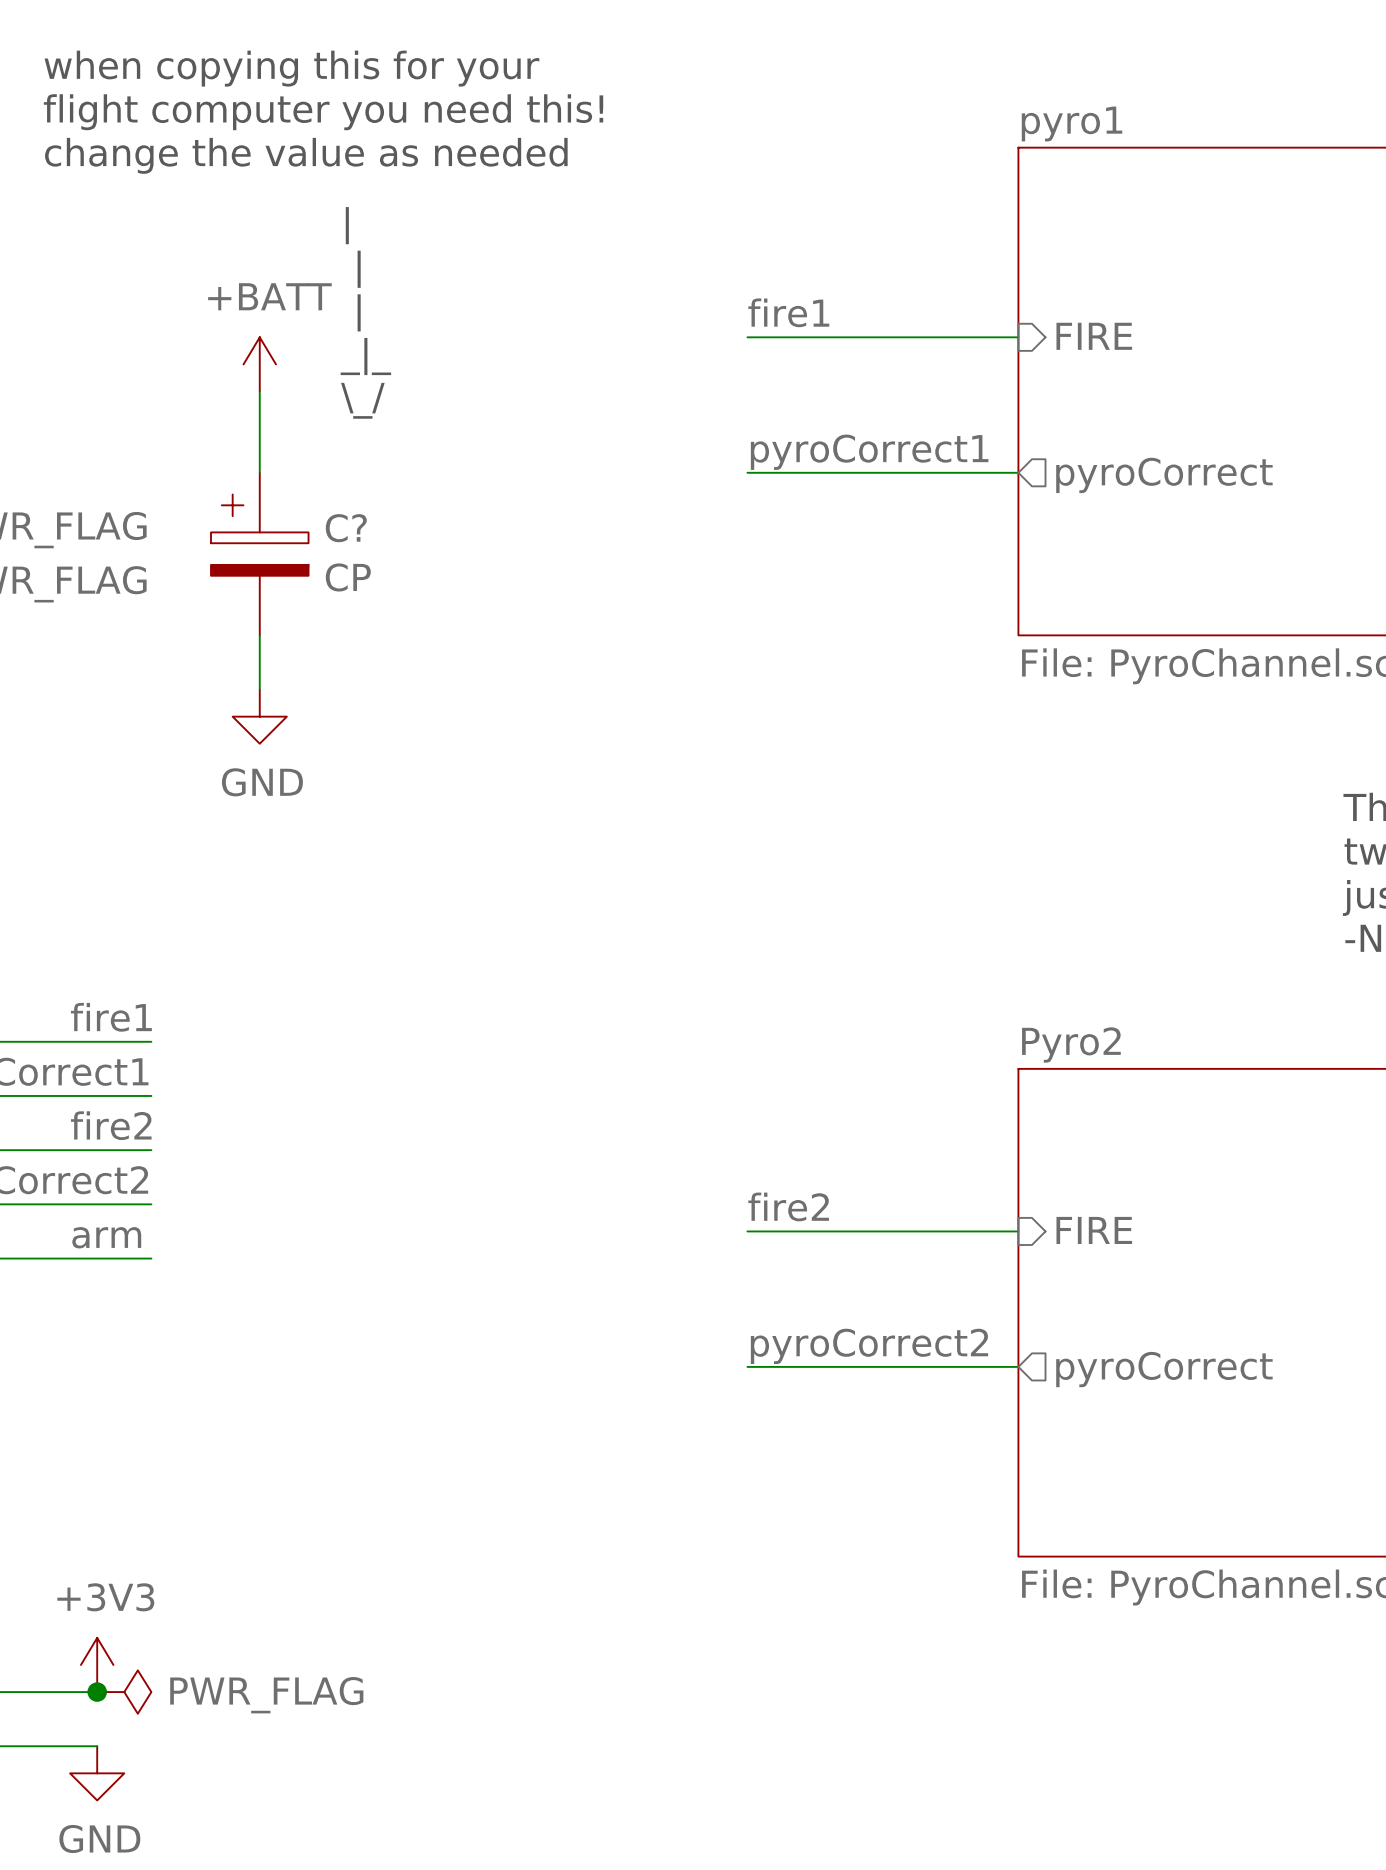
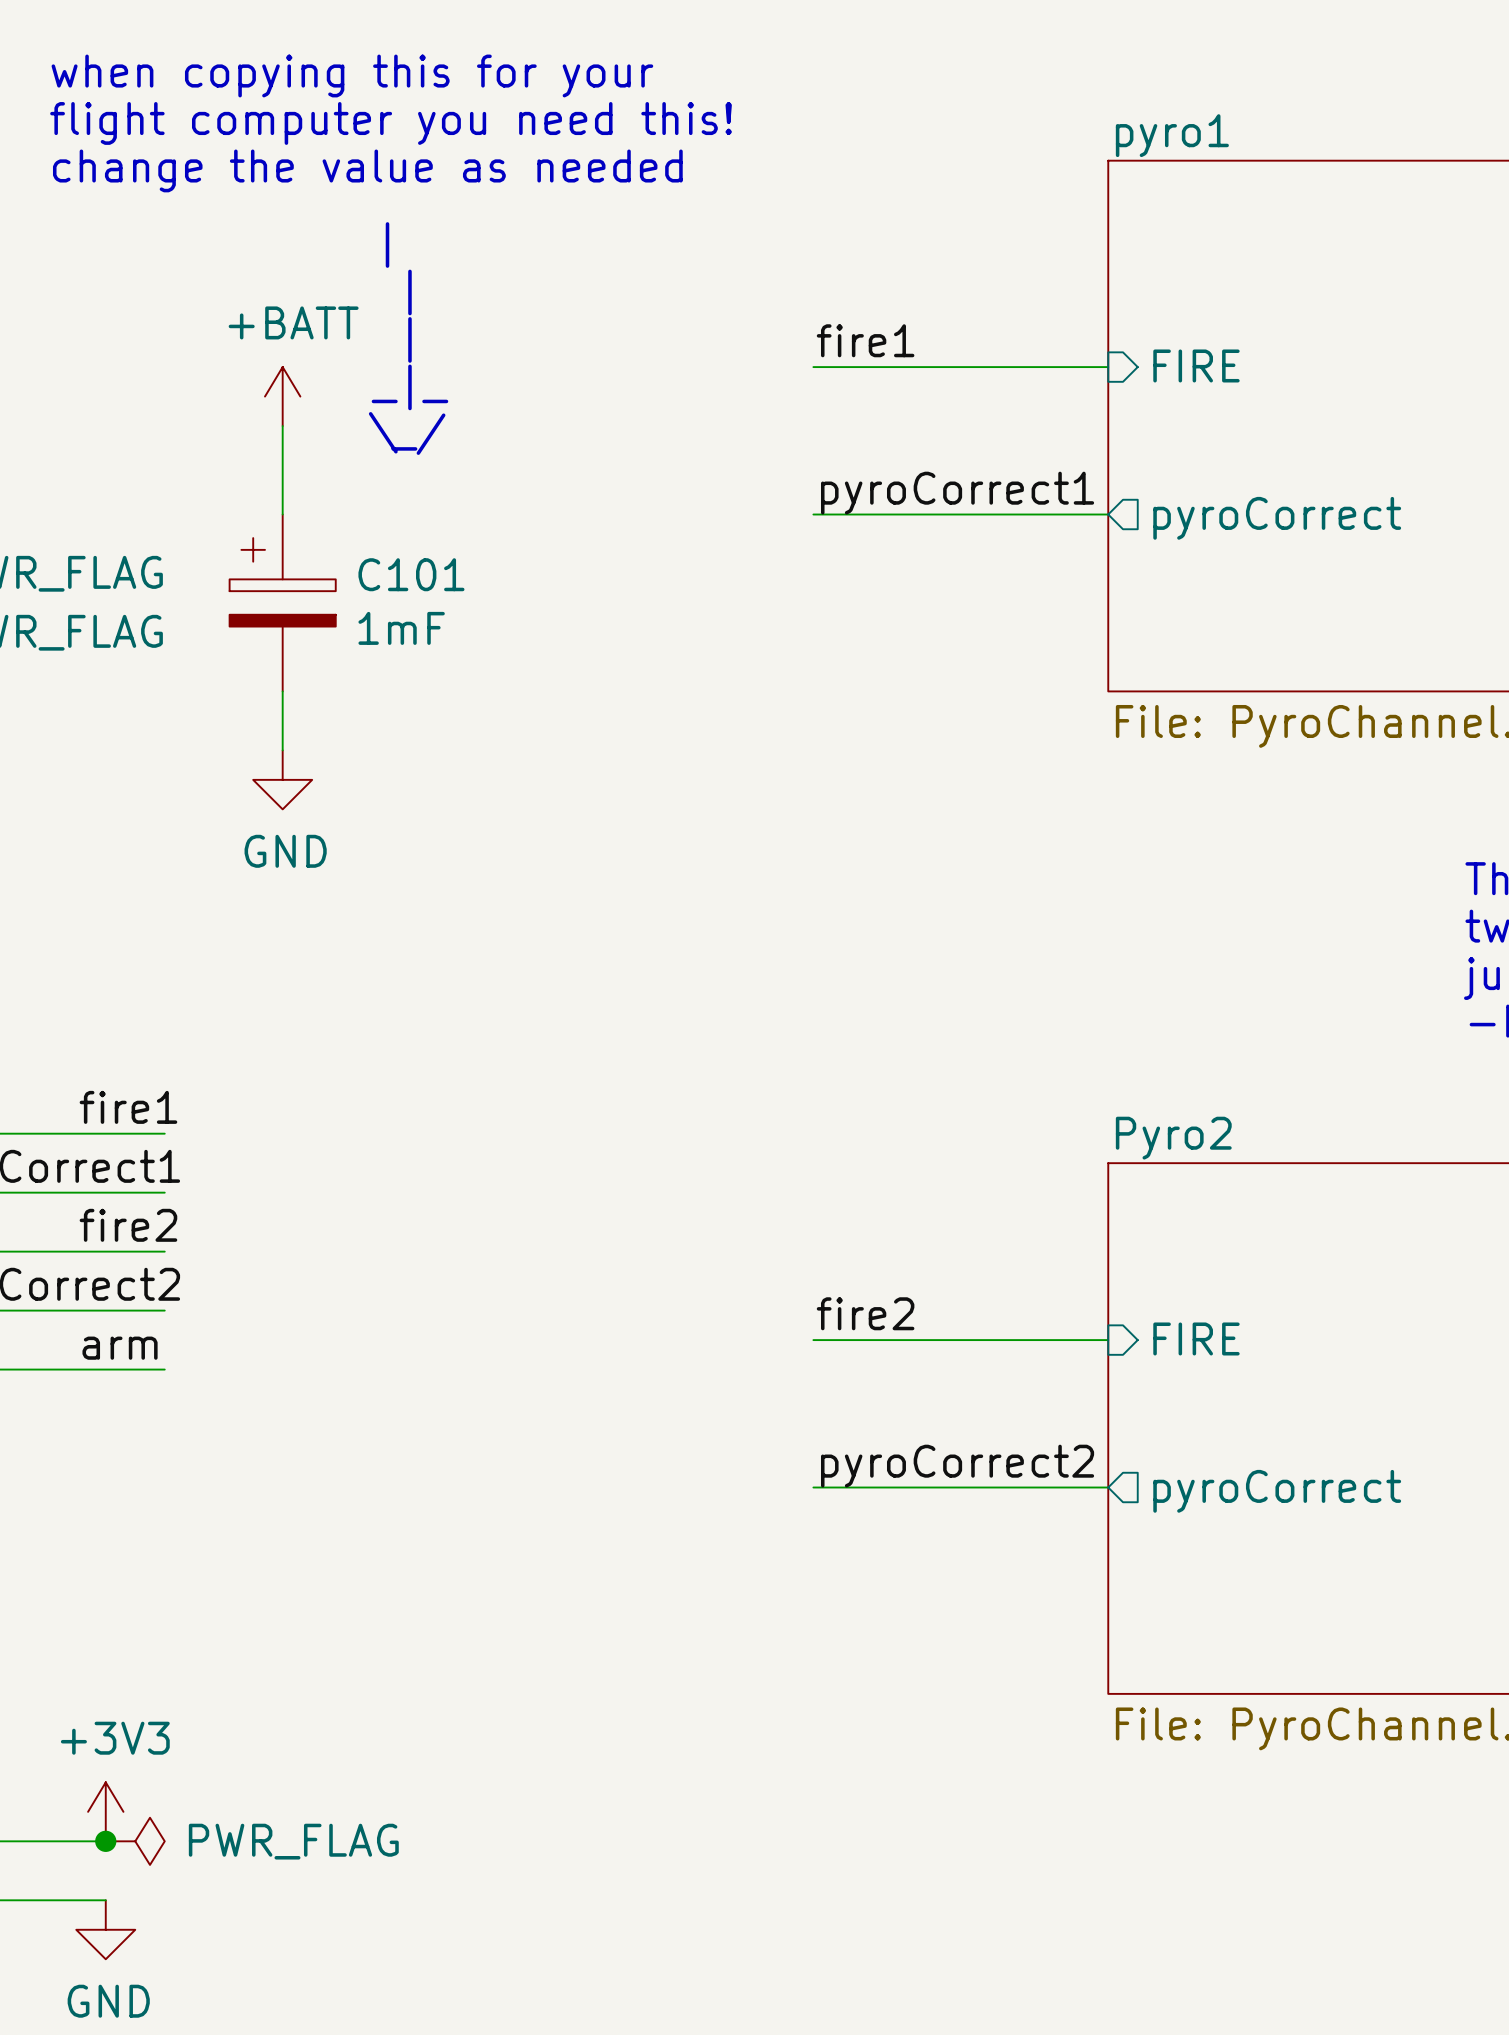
C? name: C? (346, 528) -> C101 (411, 574)
C? value: CP (348, 577) -> 1mF (401, 628)

